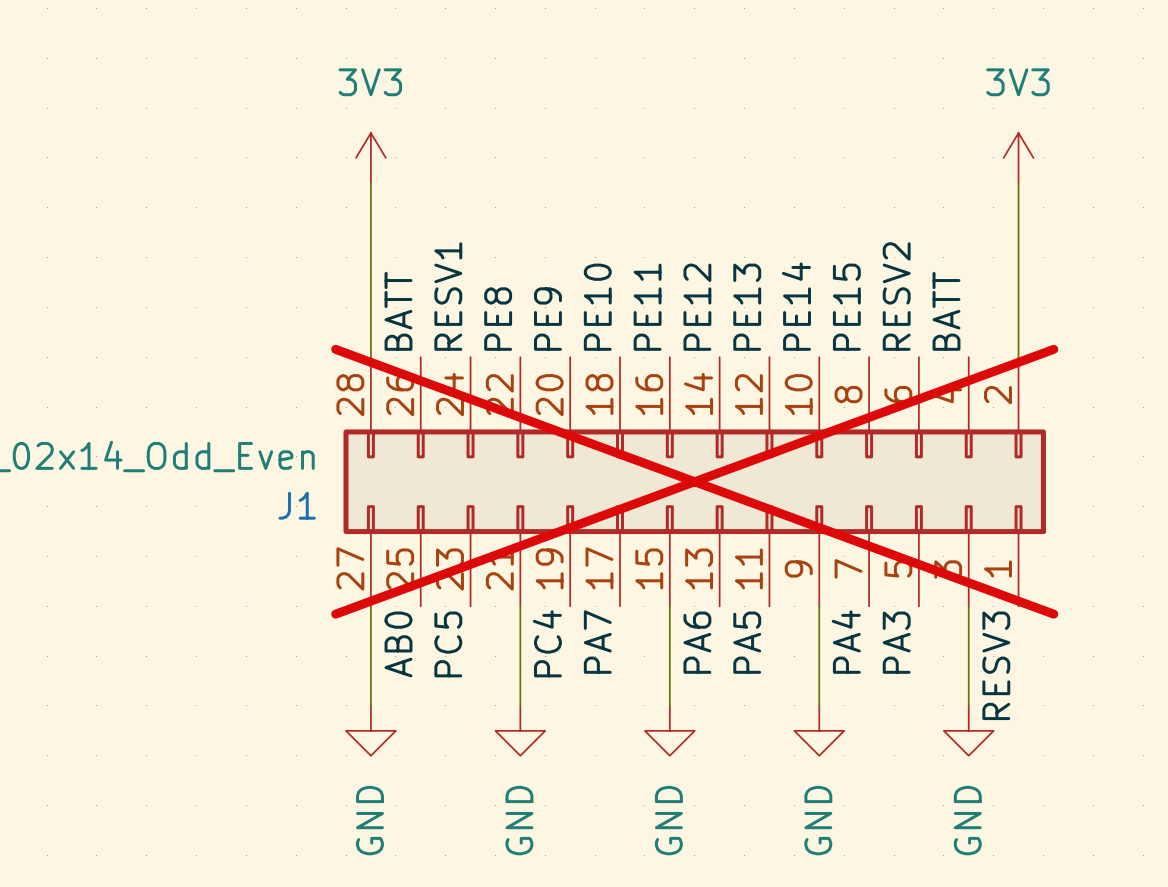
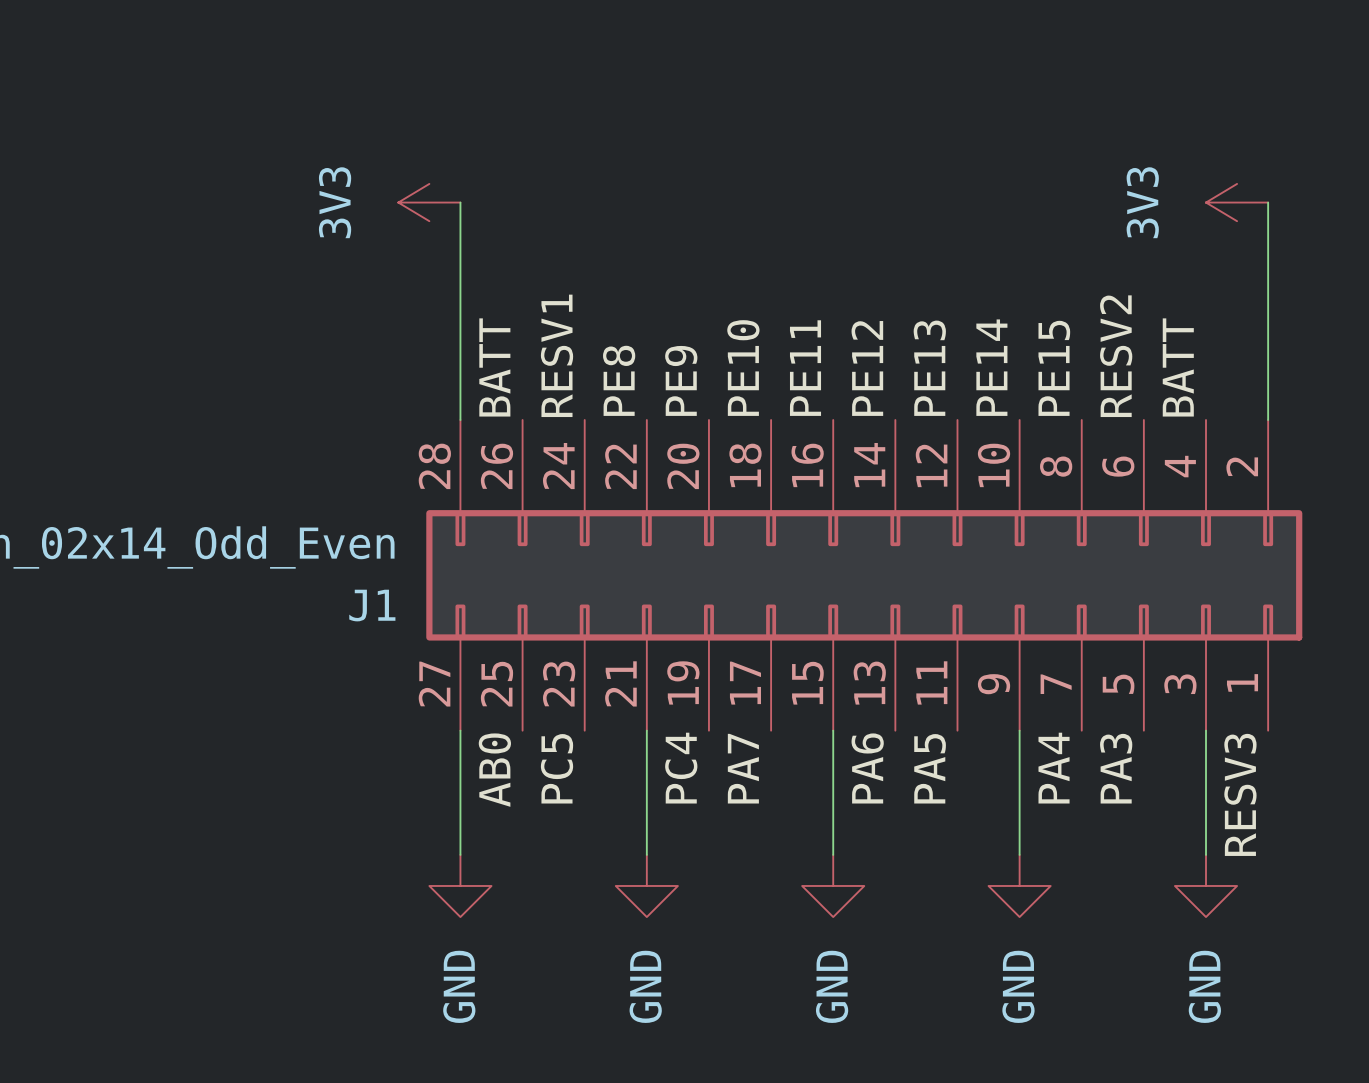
power symbol rotation: 0° (370, 157) -> 90° counterclockwise (429, 202)
power symbol position: 3V3 (370, 157) -> 3V3 (429, 202)
power symbol rotation: 0° (1018, 157) -> 90° counterclockwise (1237, 202)
power symbol position: 3V3 (1018, 157) -> 3V3 (1237, 202)
J1 do-not-place cross: (694, 481) -> none

